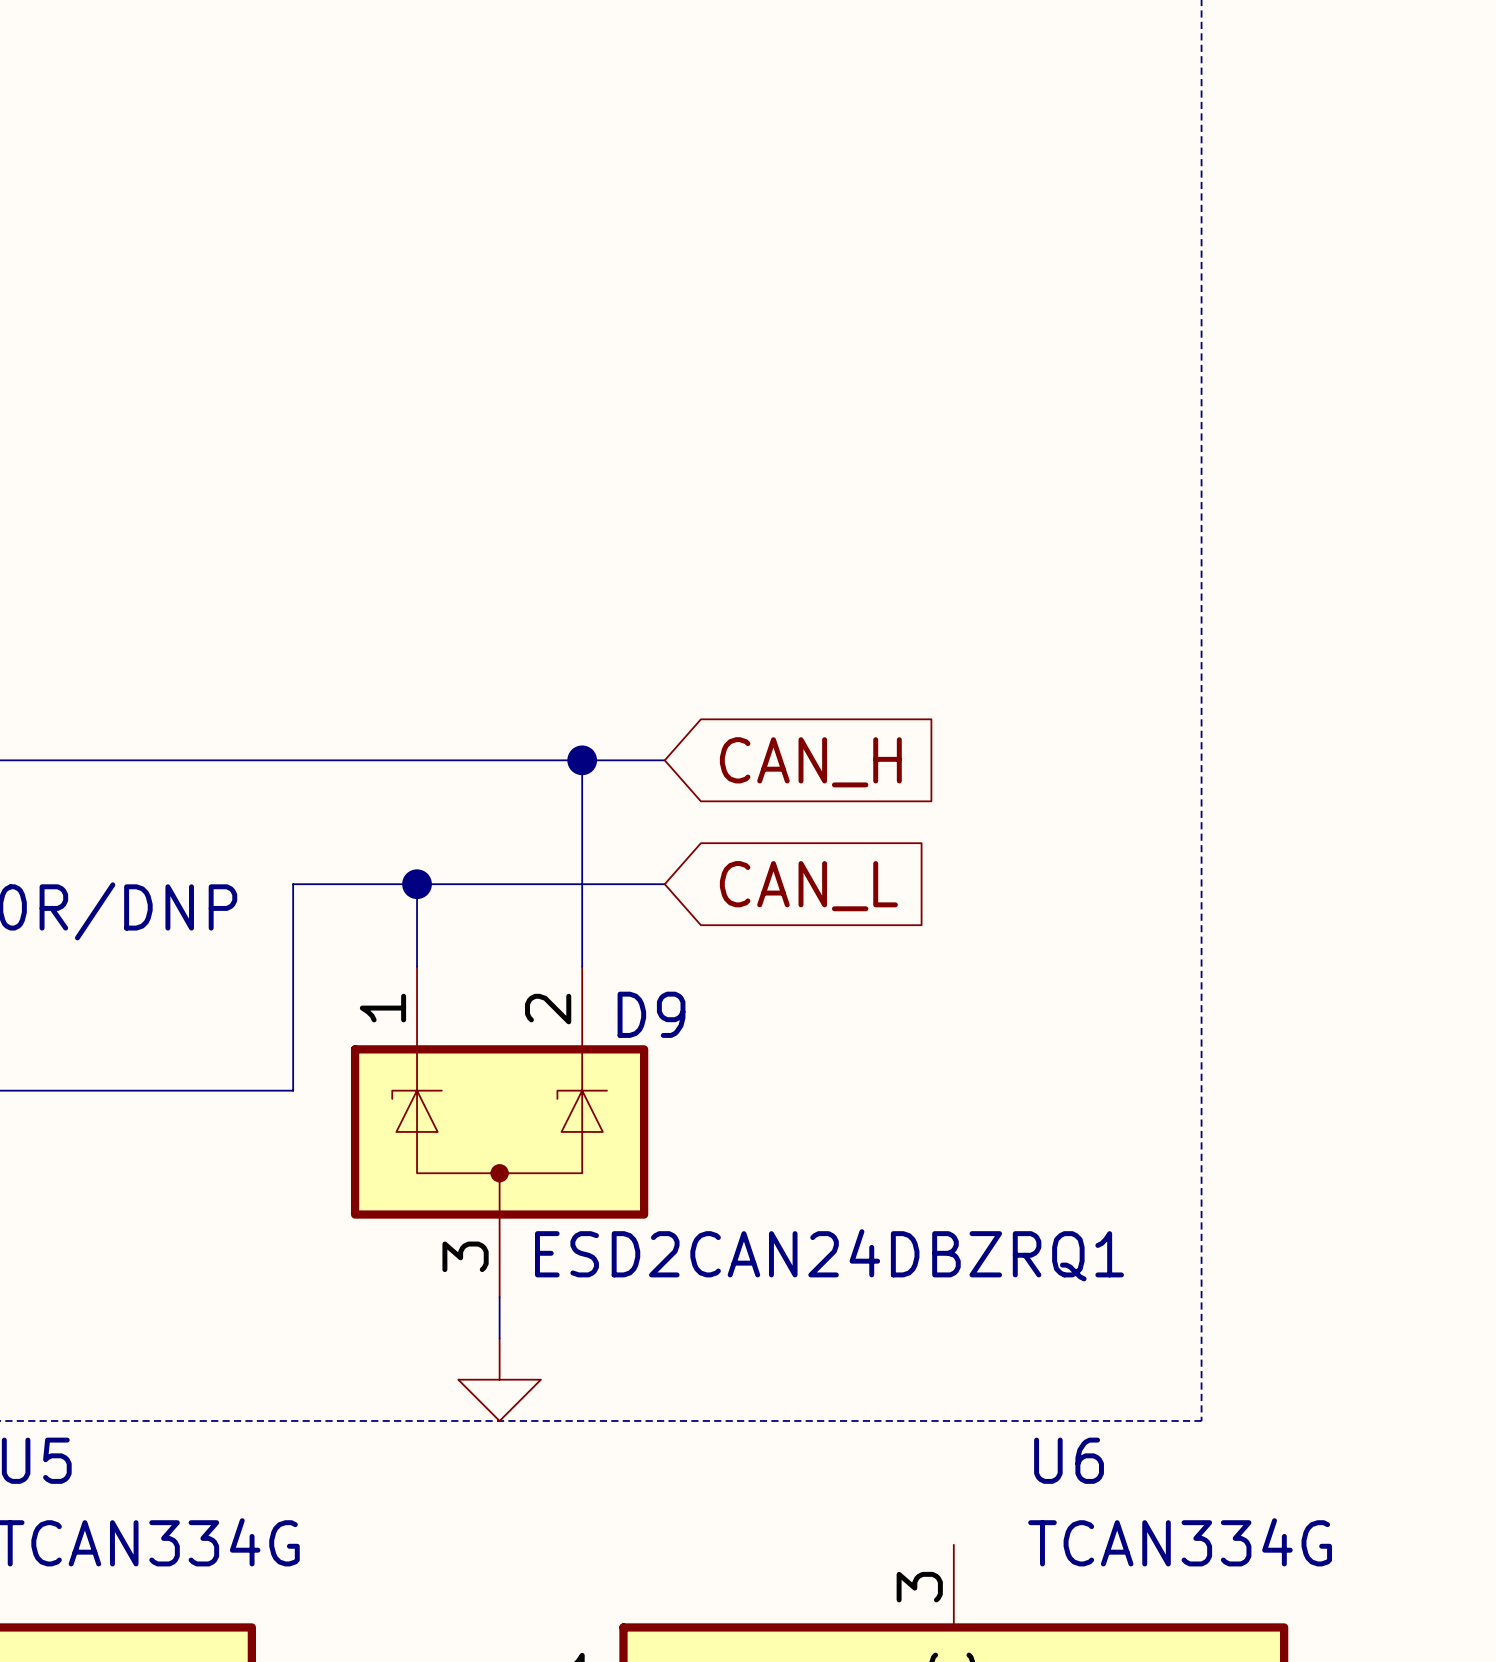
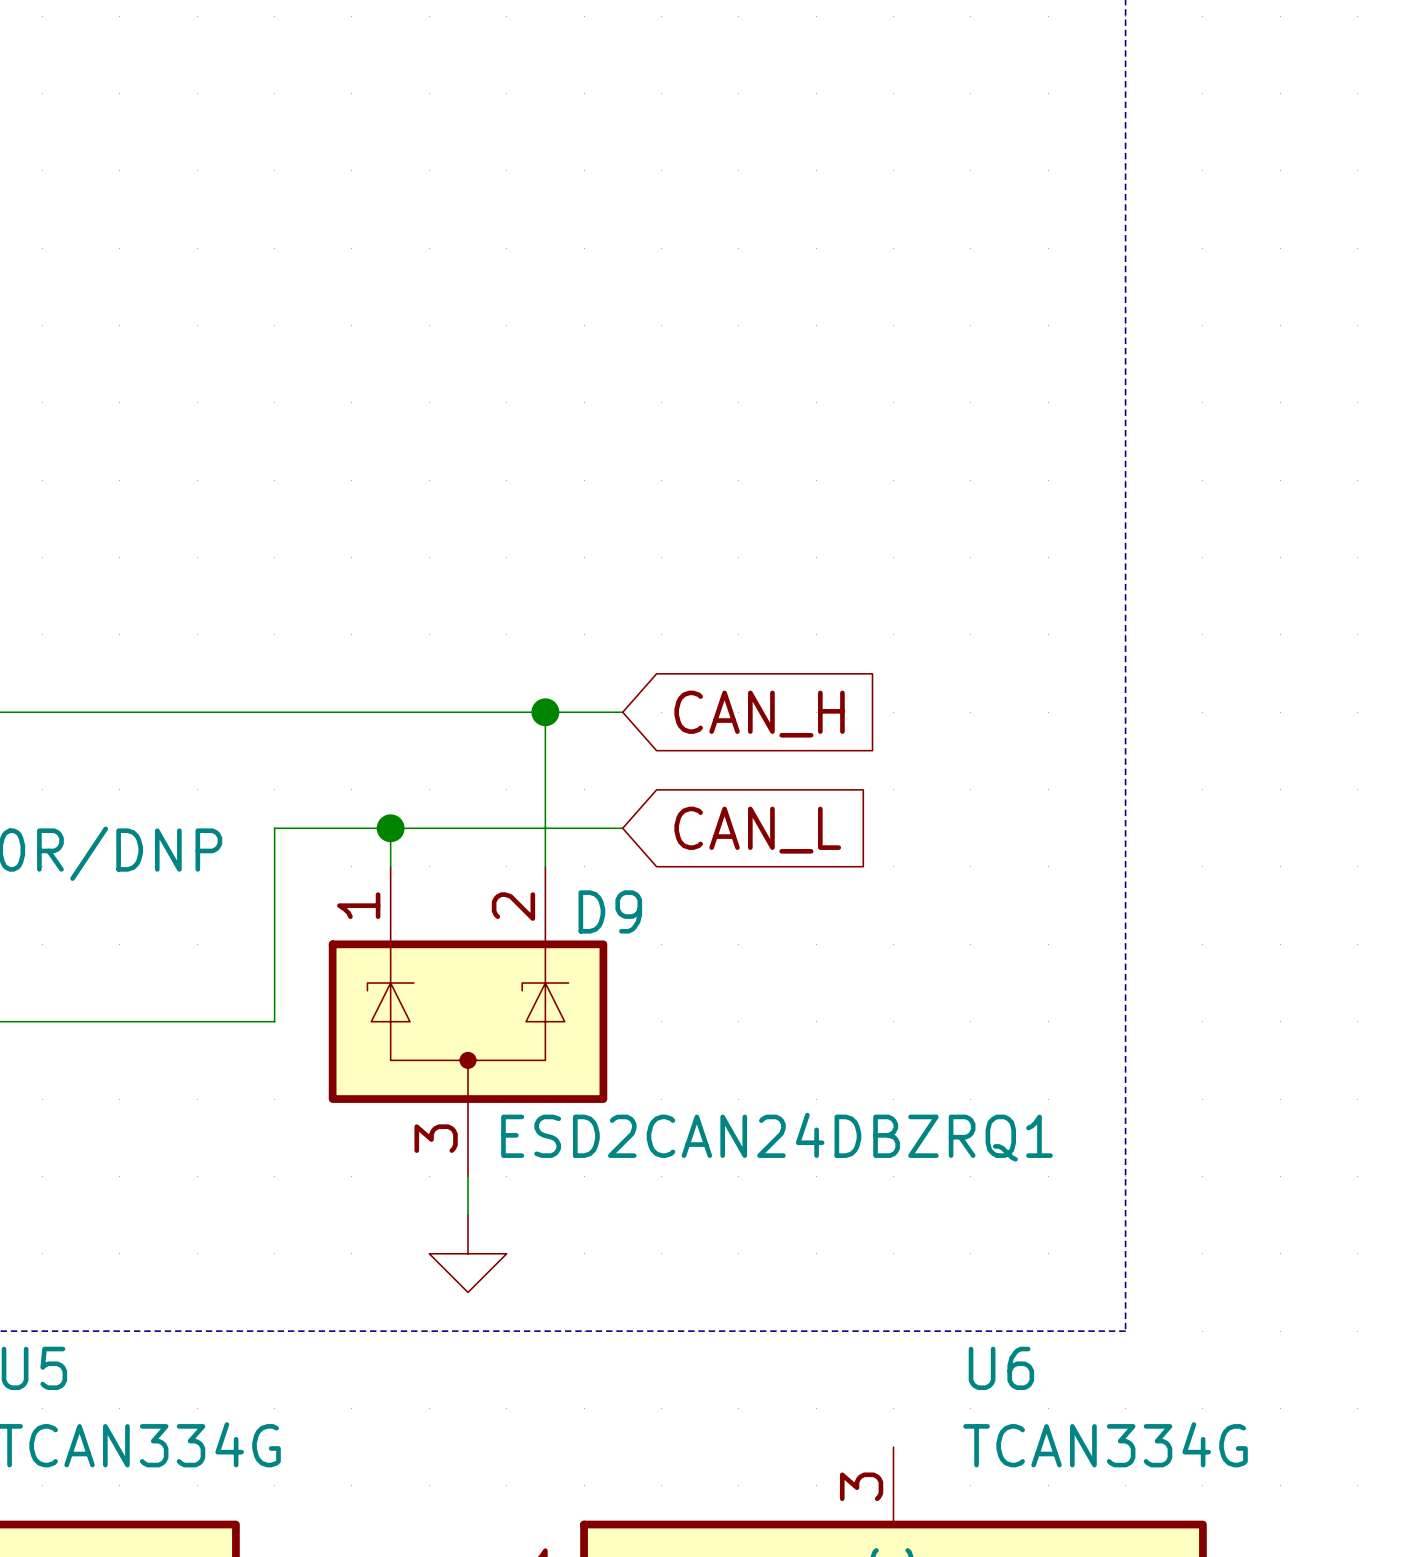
D9 position: (499, 1131) -> (468, 1021)
power symbol position: (499, 1379) -> (468, 1253)

